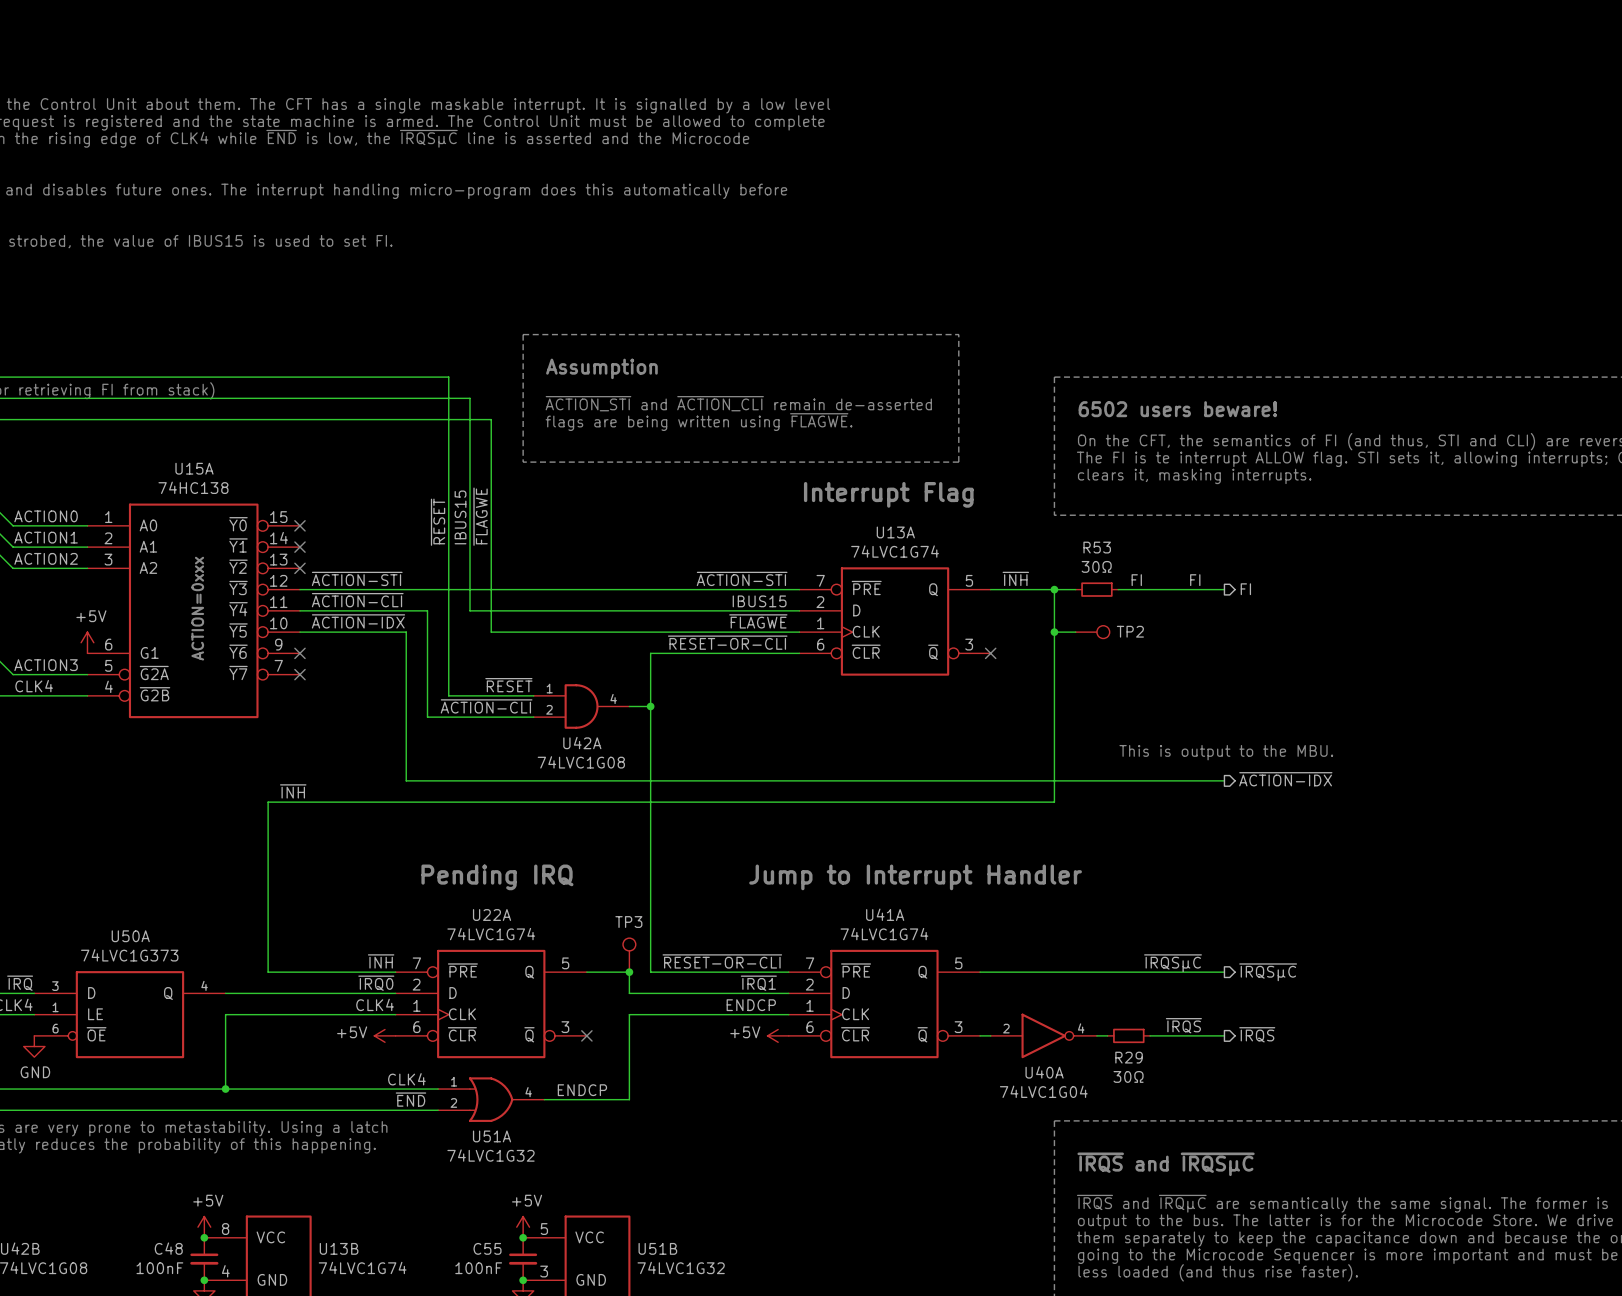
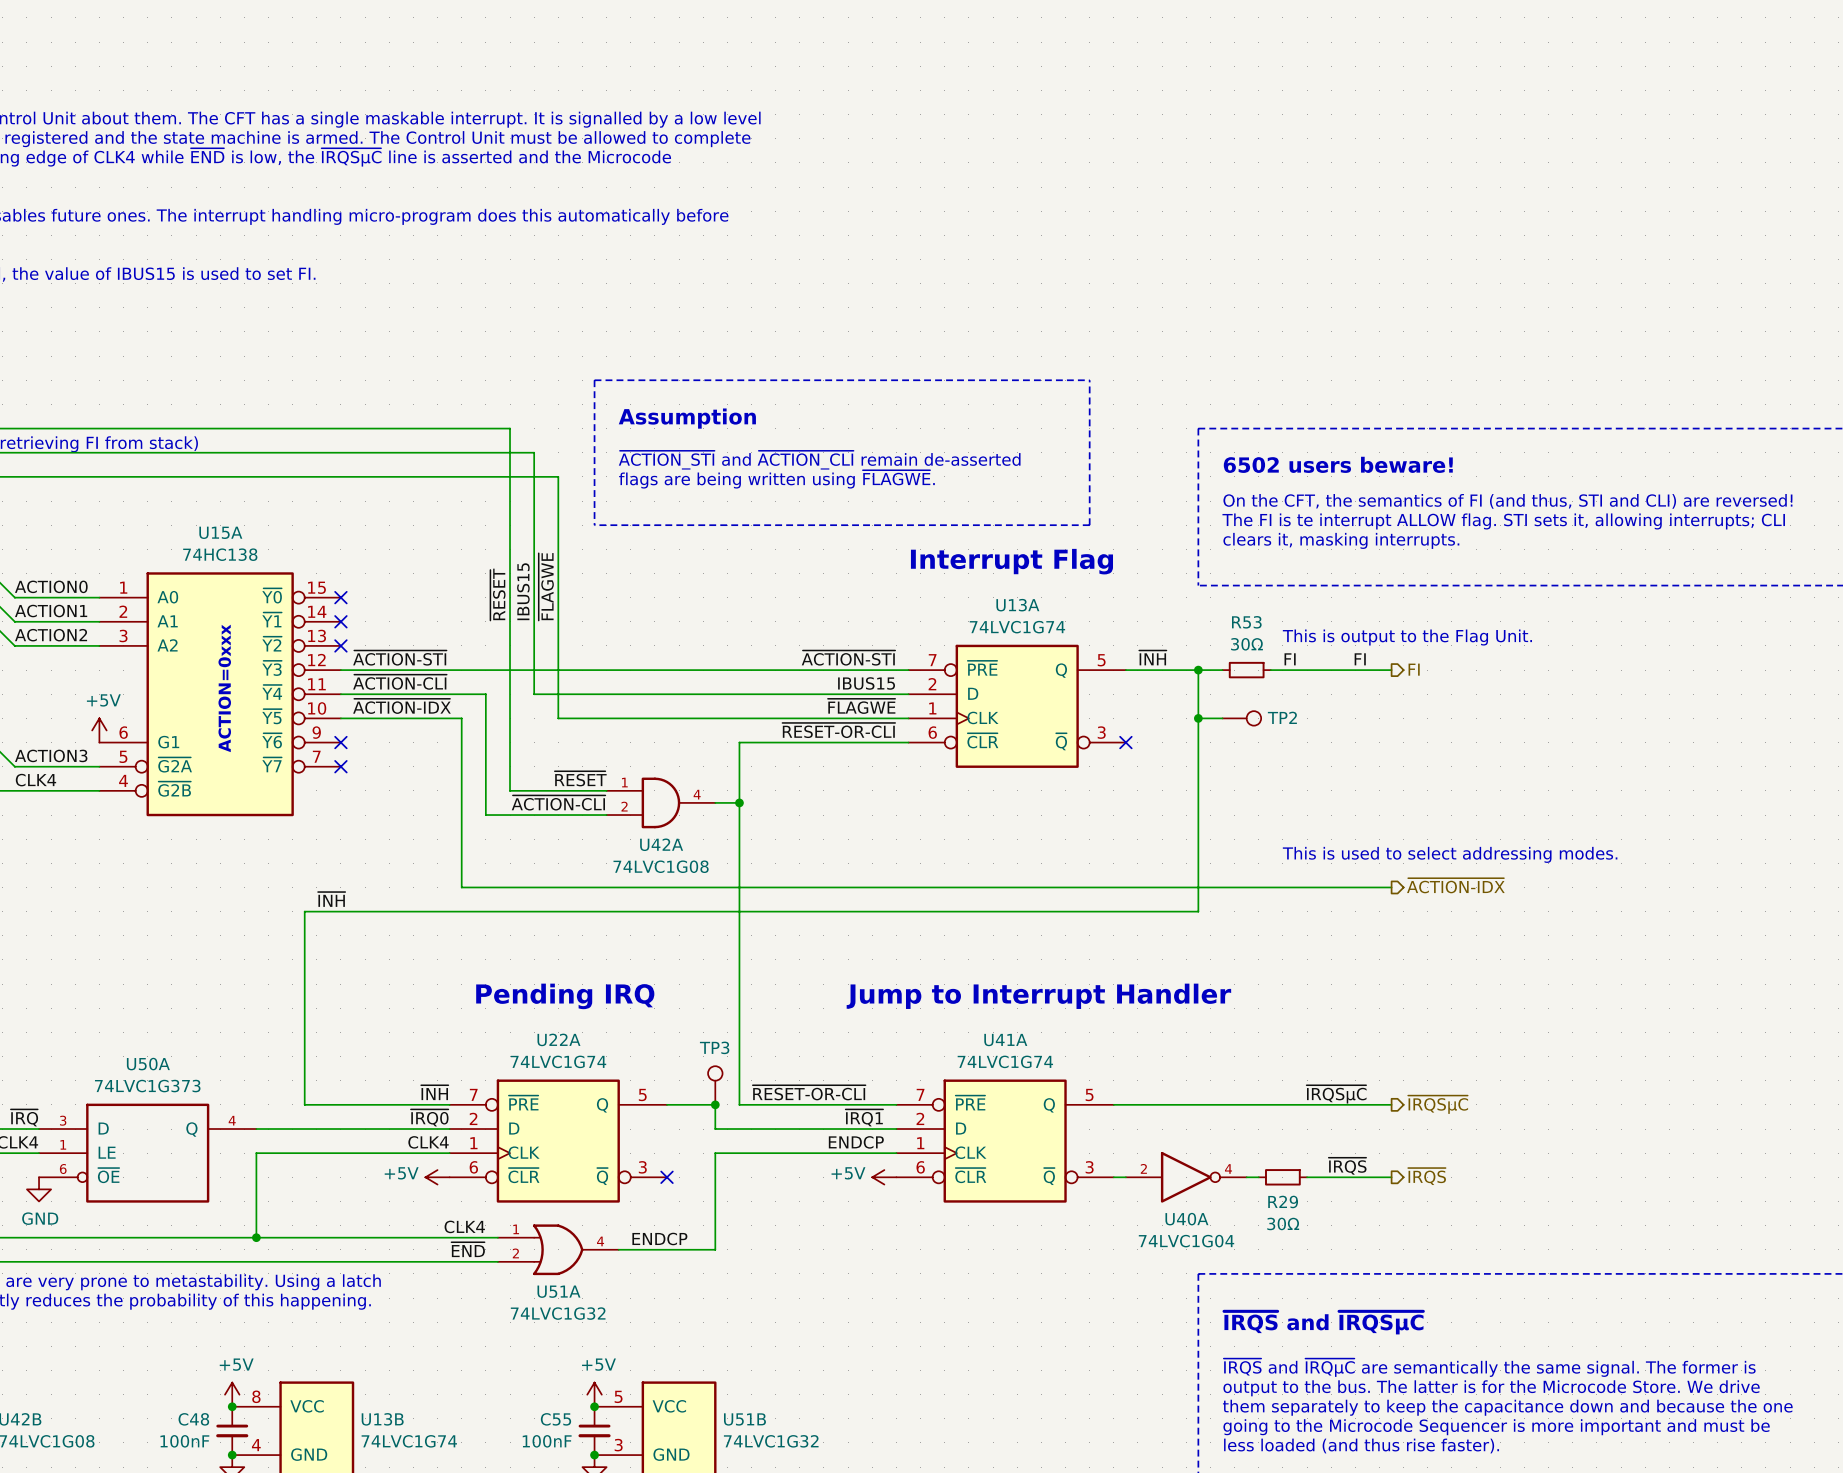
text: none -> This is output to the Flag Unit. (1407, 637)
text: This is output to the MBU. (1226, 752) -> none
text: none -> This is used to select addressing modes. (1450, 854)

